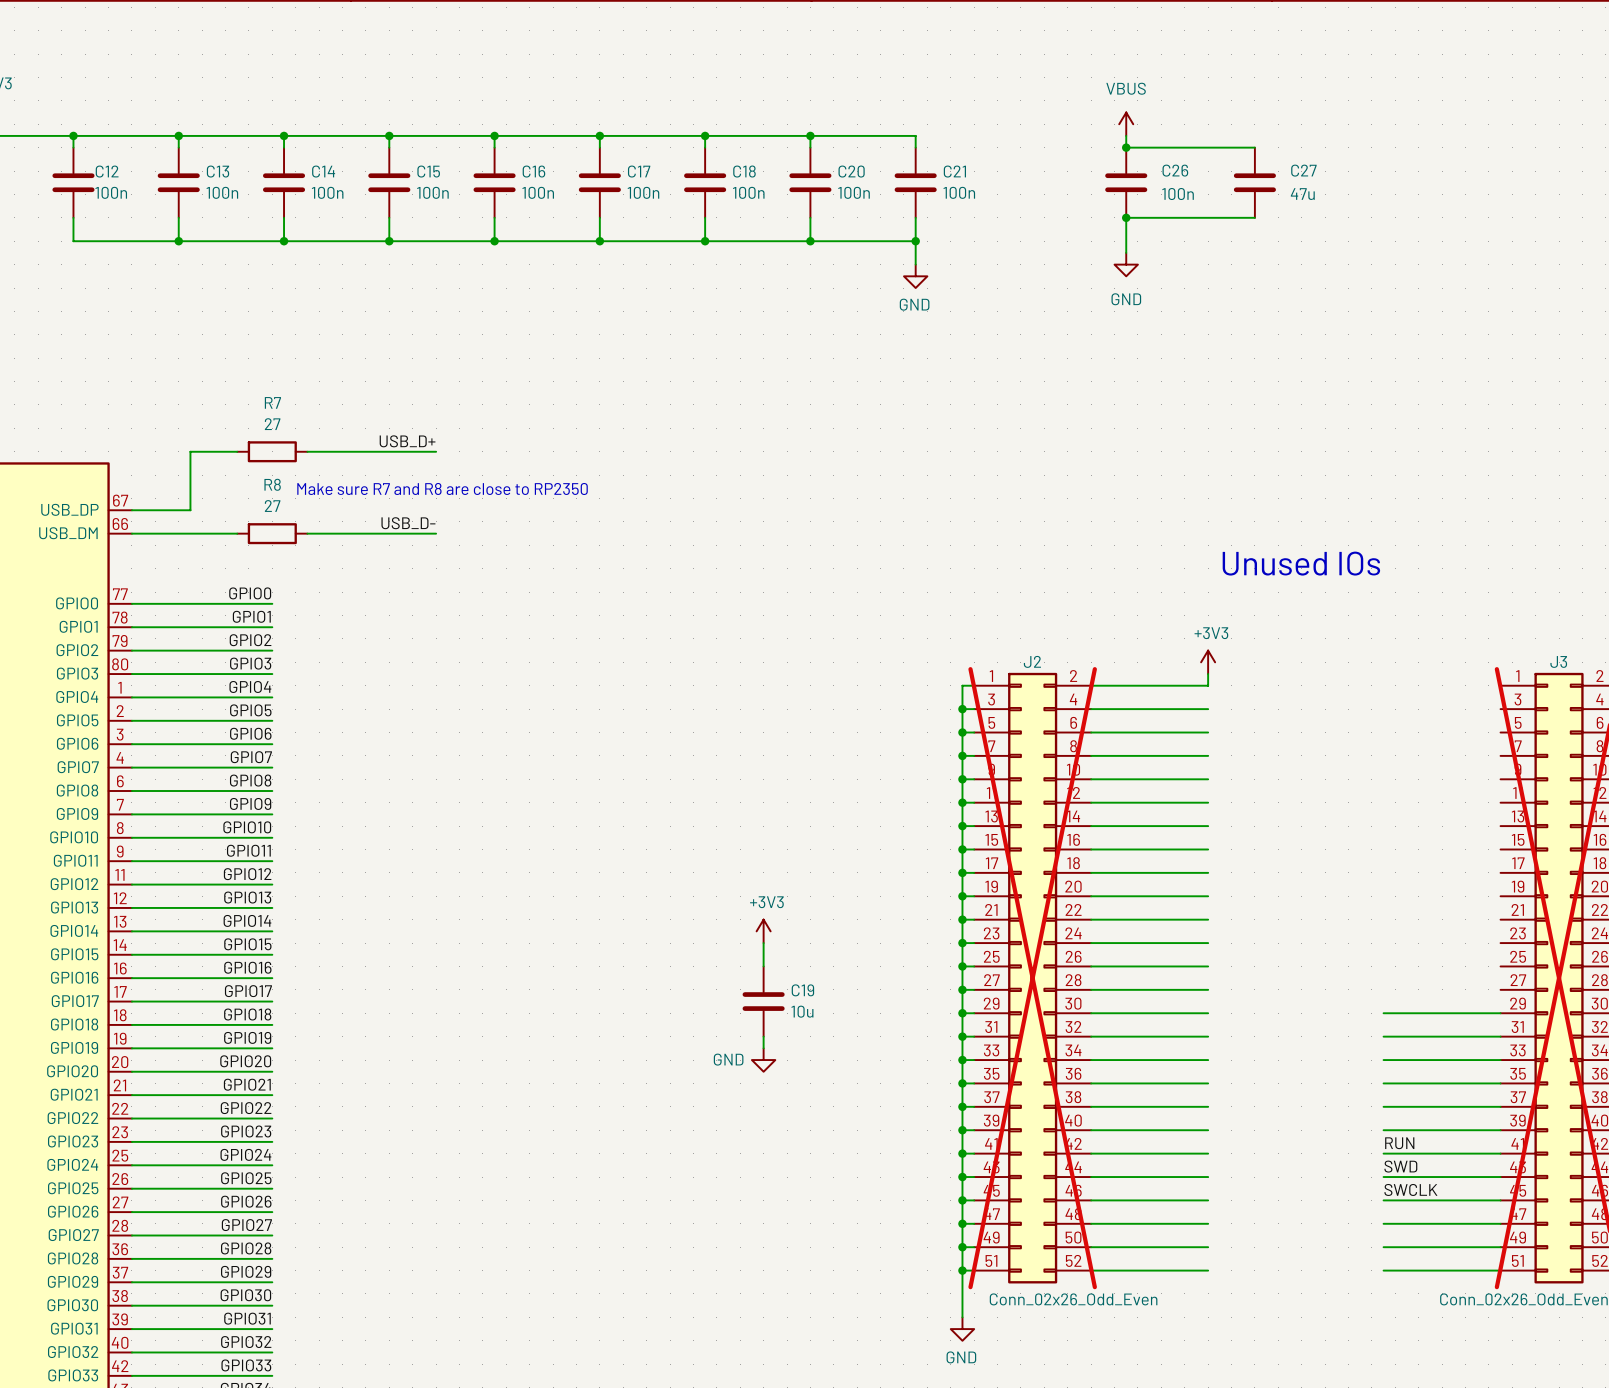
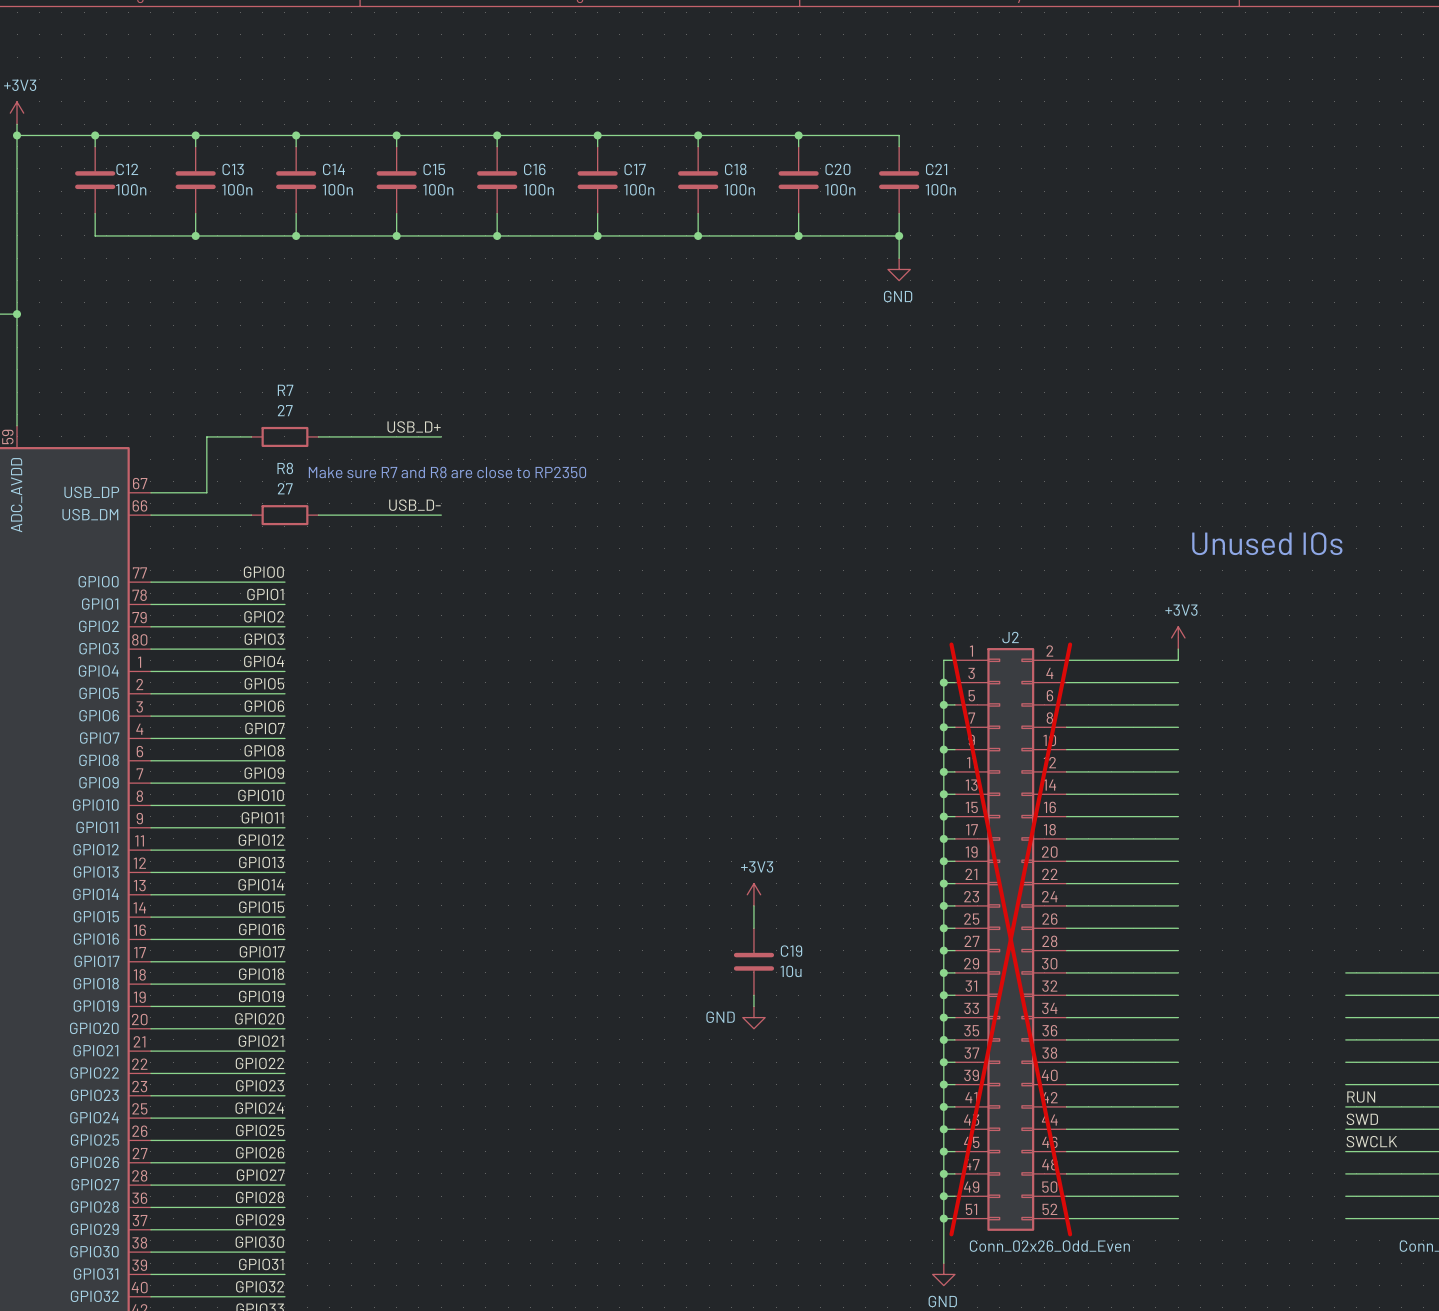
power symbol: VBUS (1126, 124) -> none
wire: (1126, 135) (1126, 147) (1254, 147) -> none
junction: (1126, 147) -> none
C26: 100n (1126, 182) -> none
C27: 47u (1254, 182) -> none
junction: (1126, 217) -> none
wire: (1254, 217) (1126, 217) (1126, 252) -> none
power symbol: GND (1126, 264) -> none

